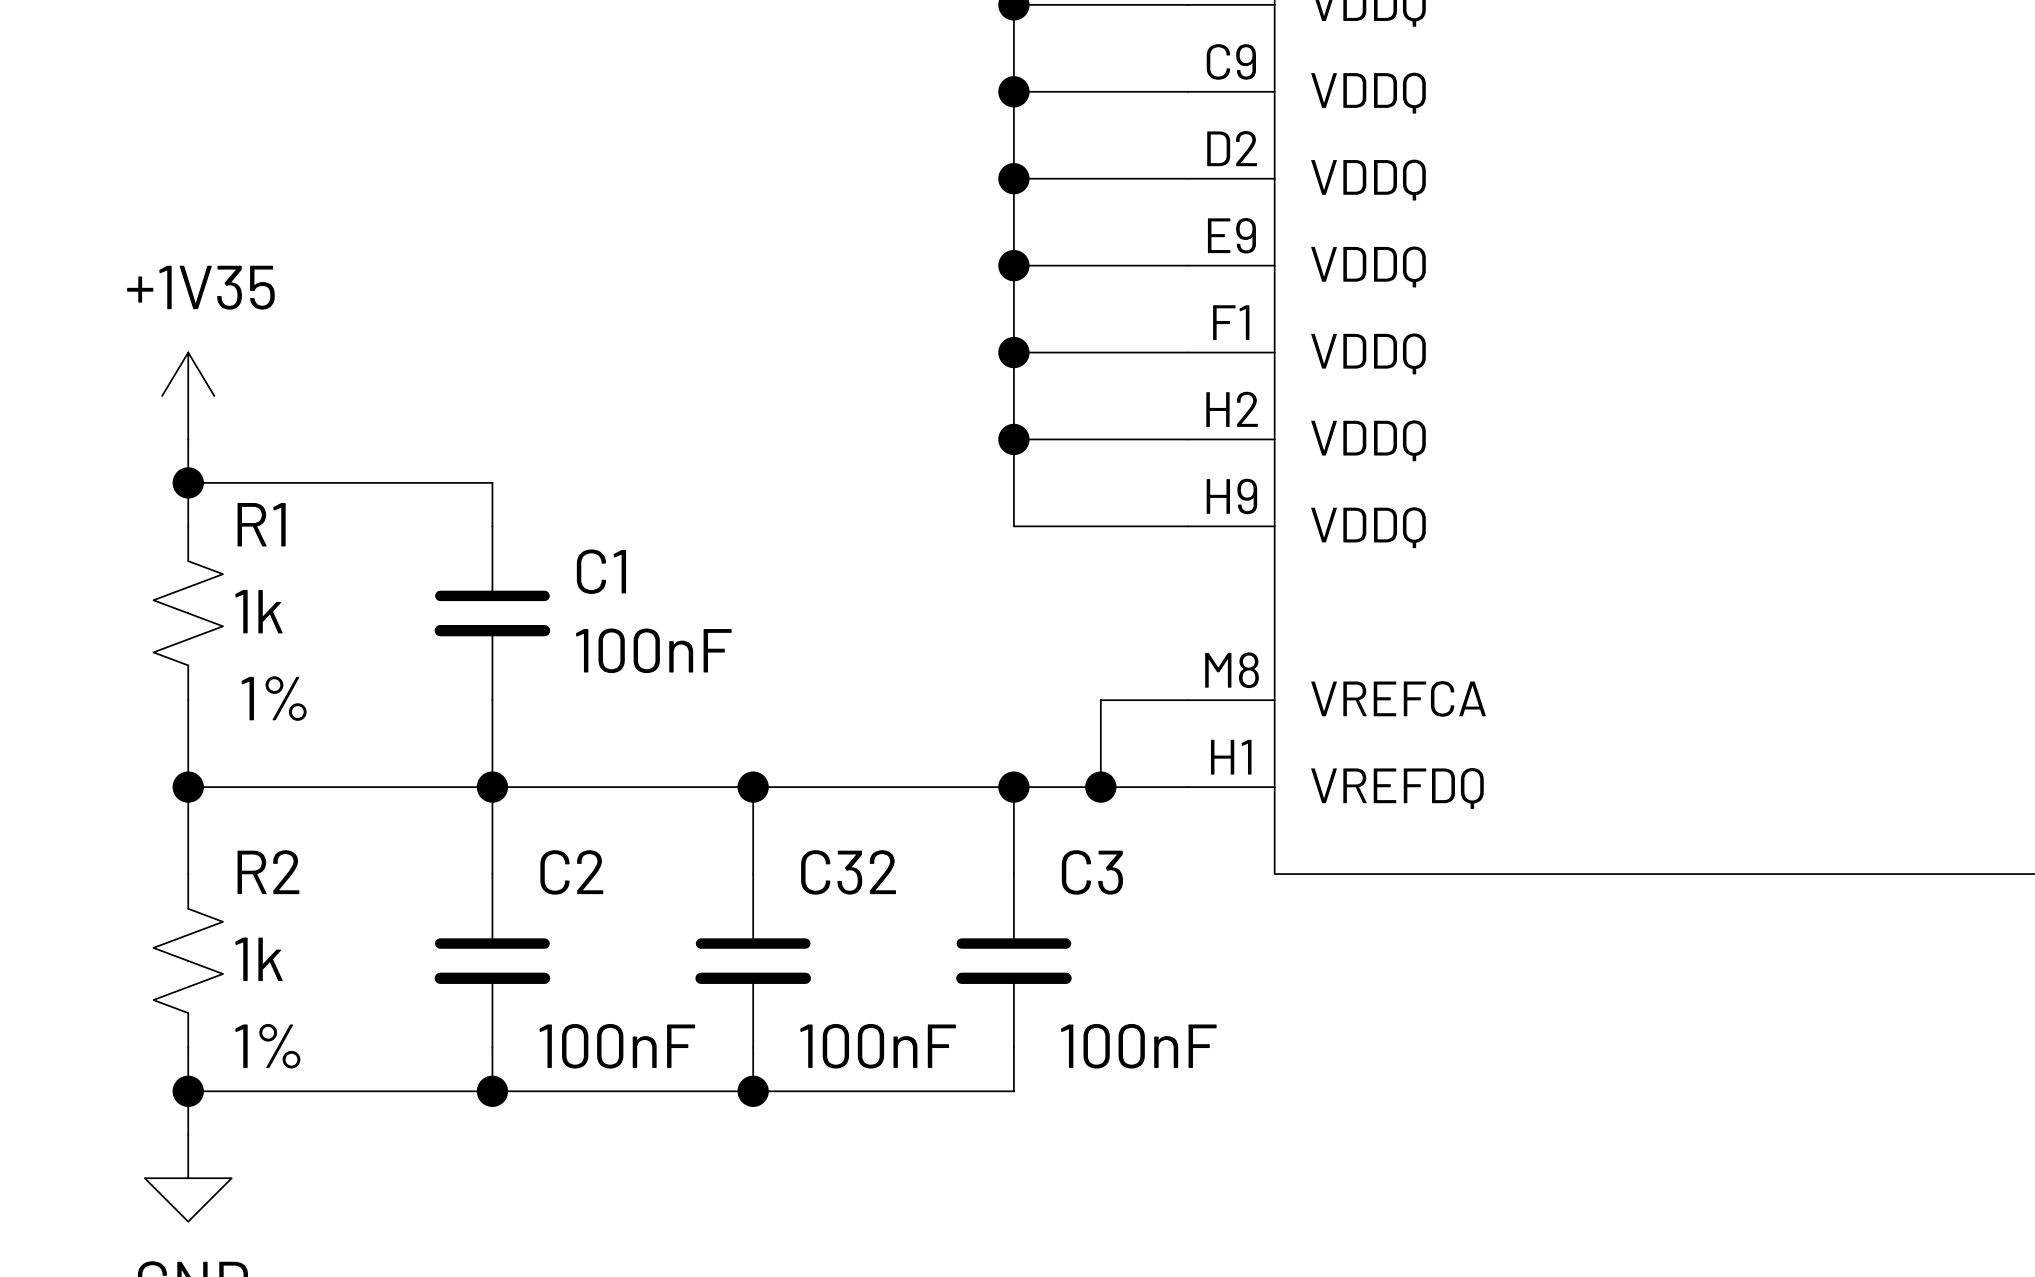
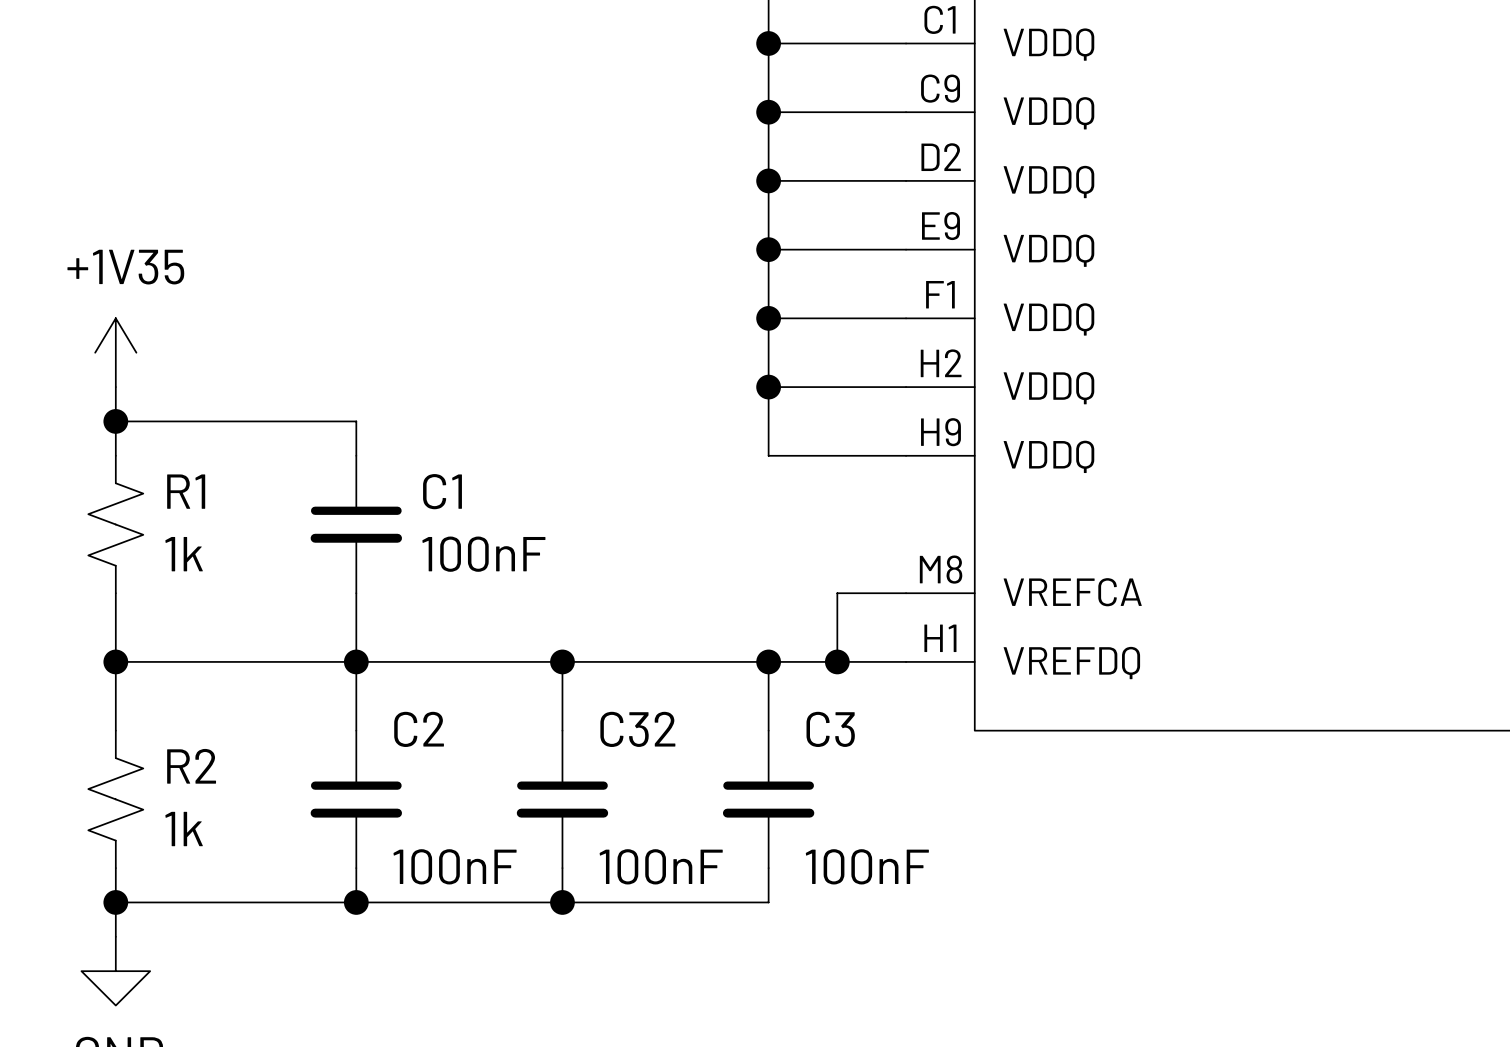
R1 name position: R1 (261, 524) -> R1 (186, 491)
R1 value position: 1k (258, 611) -> 1k (184, 554)
R1 text: 1% (274, 698) -> none
R2 name position: R2 (268, 872) -> R2 (191, 766)
R2 value position: 1k (258, 959) -> 1k (184, 829)
R2 text: 1% (267, 1046) -> none

